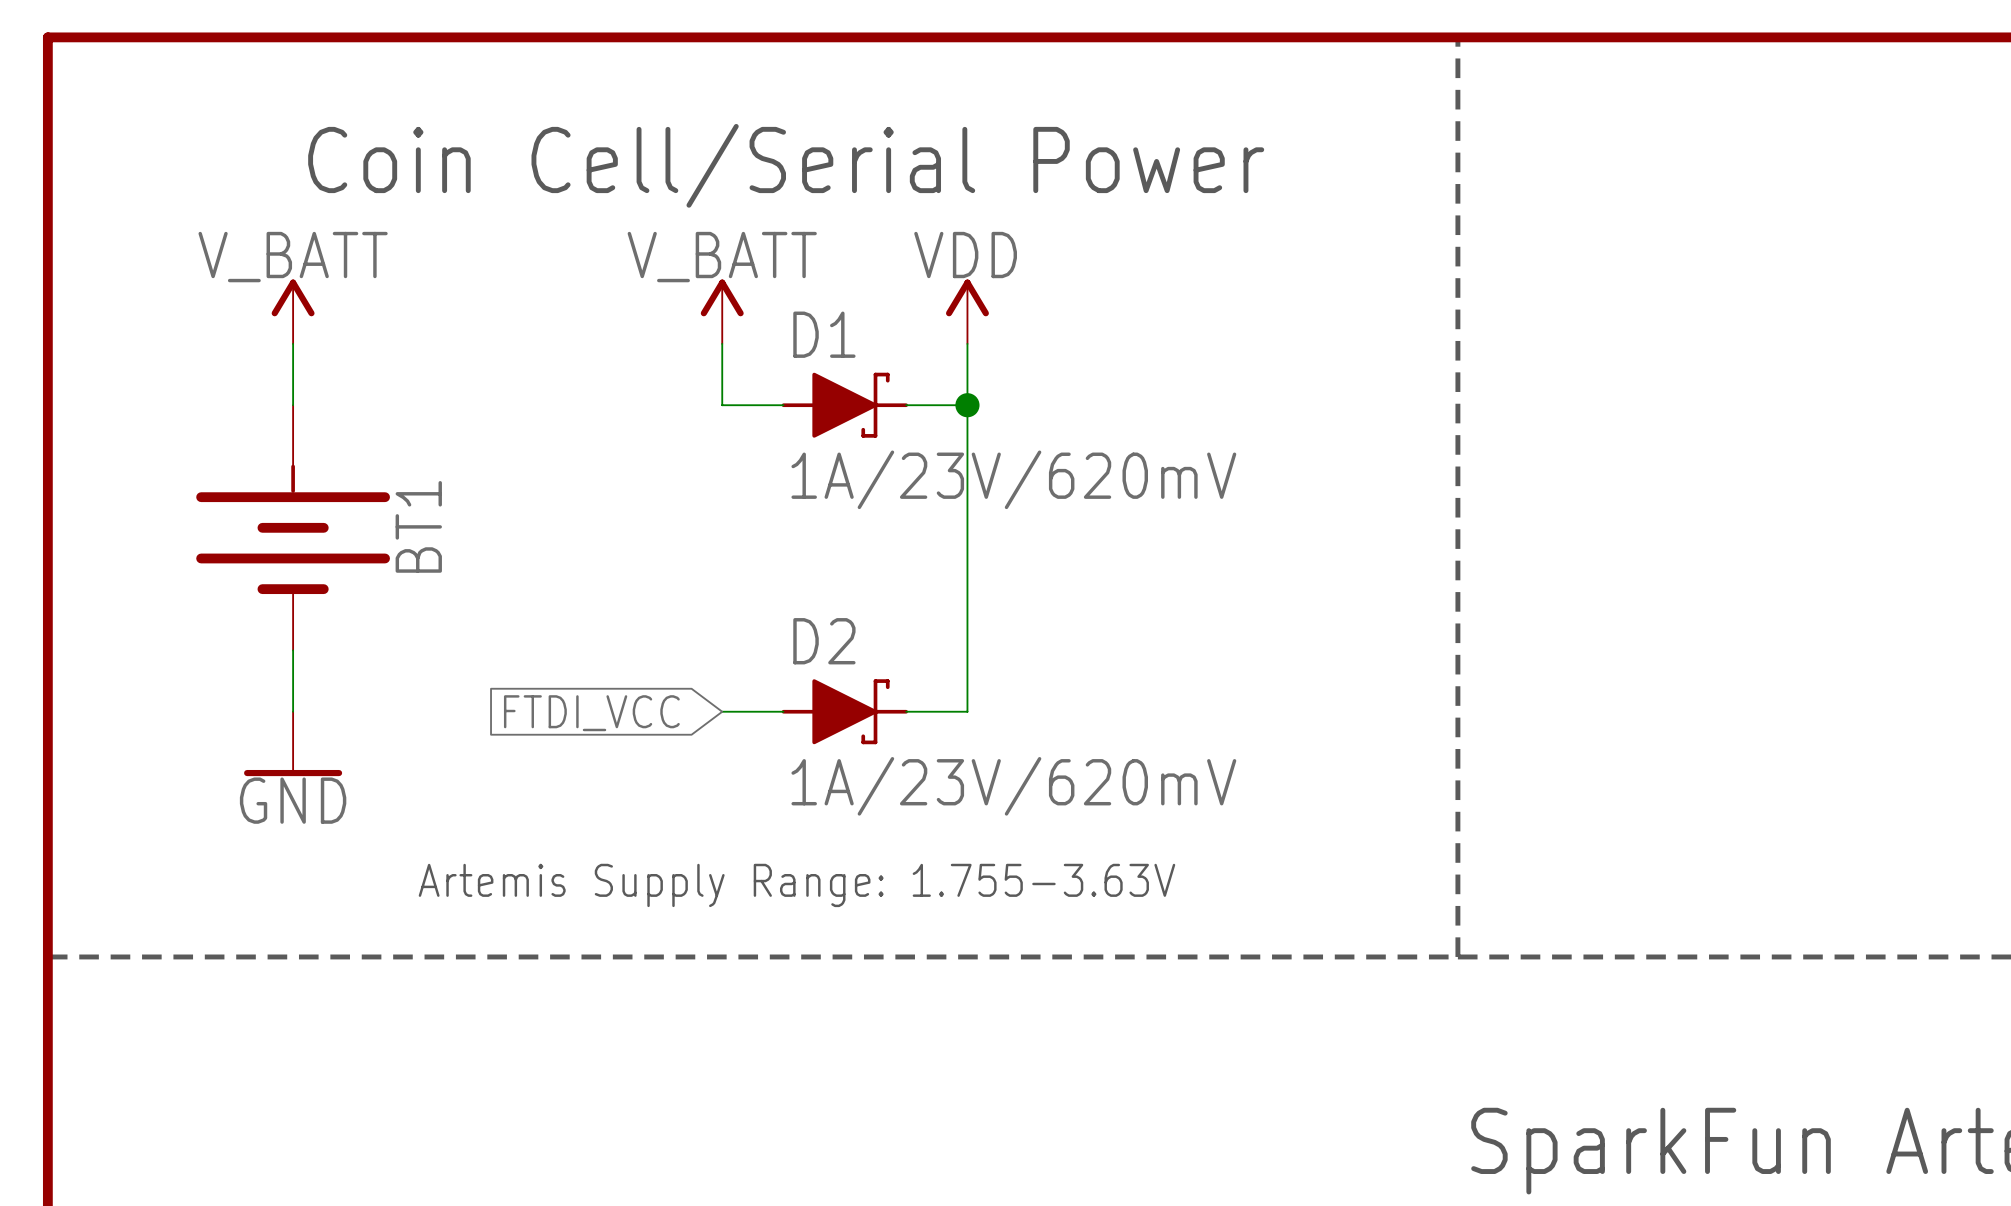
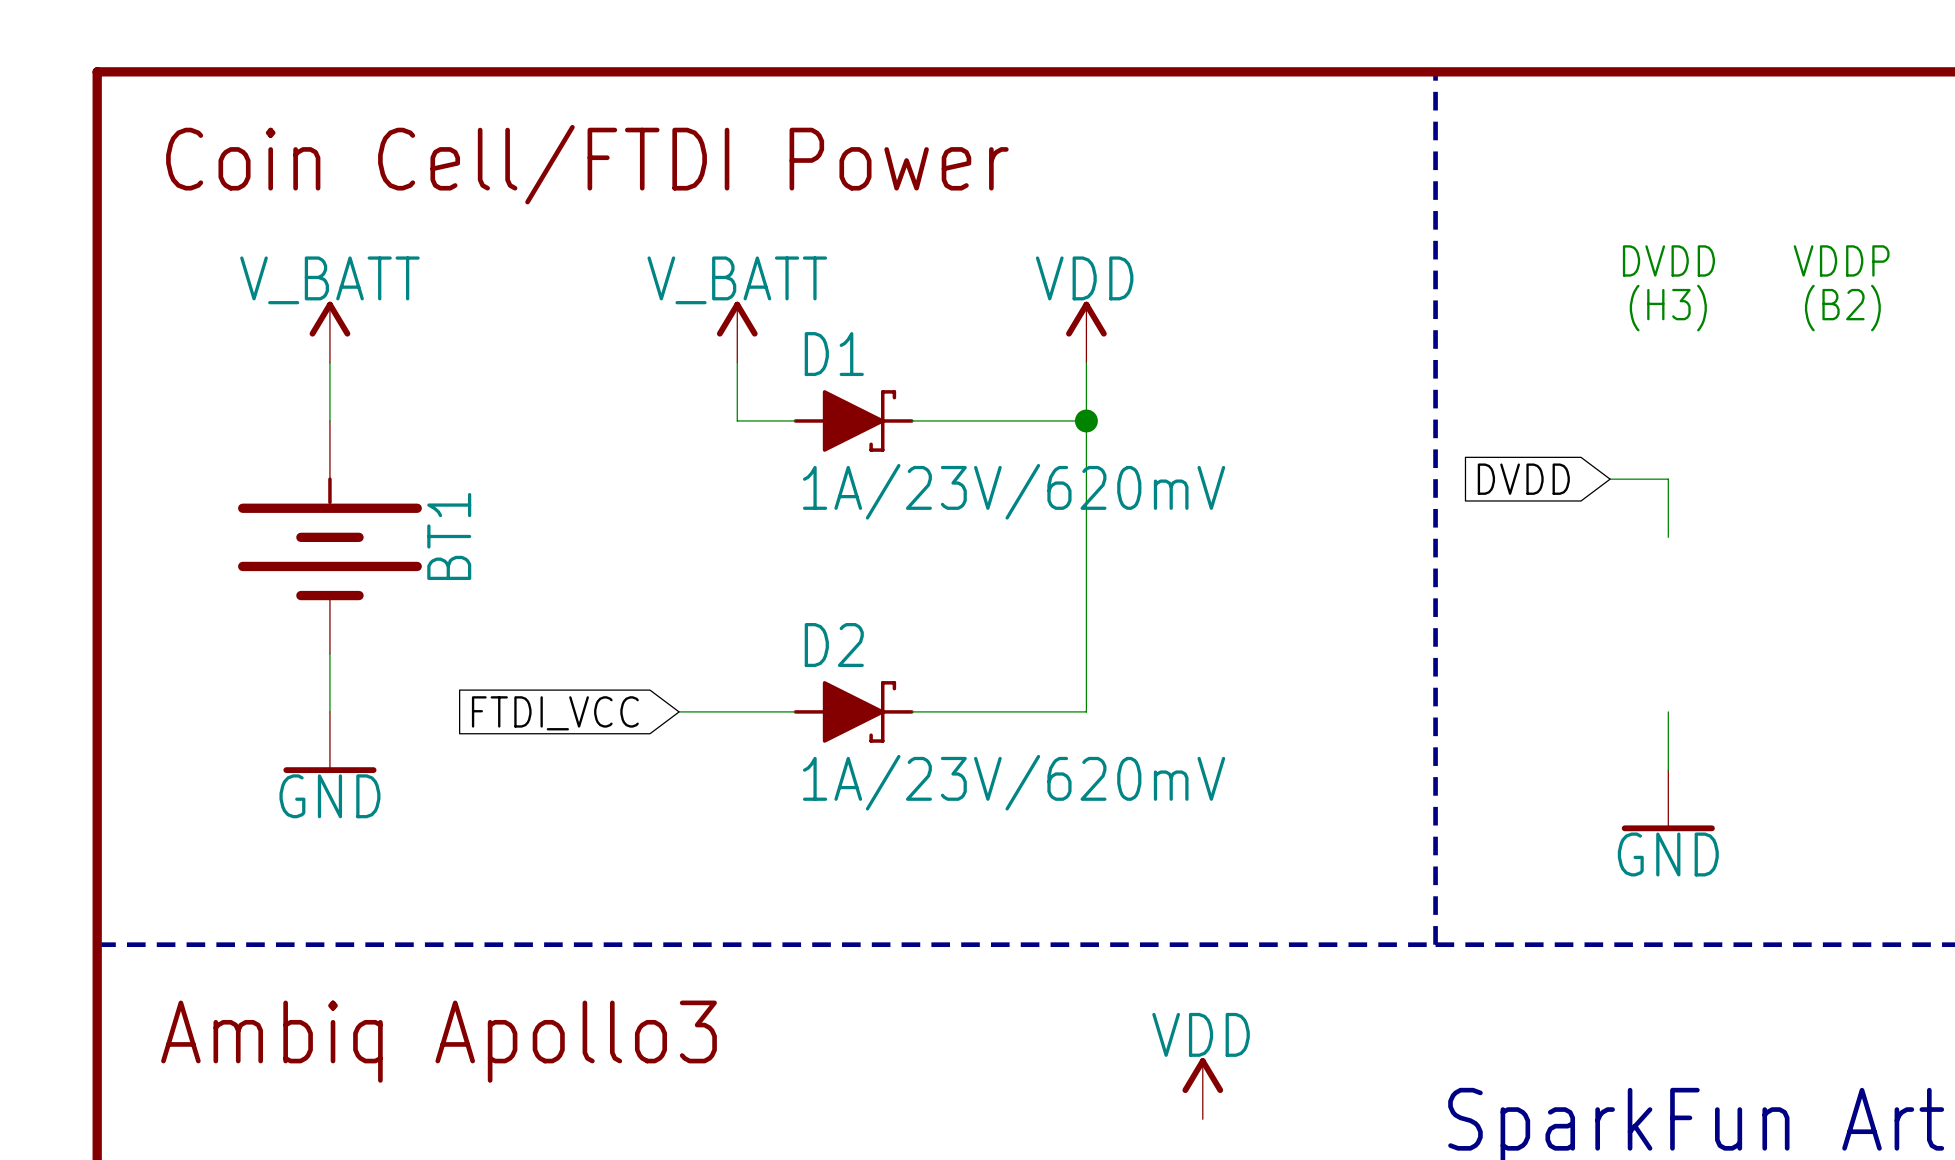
text: none -> Coin Cell/FTDI Power (587, 164)
text: Coin Cell/Serial Power (786, 165) -> none
text: none -> DVDD (1668, 260)
text: none -> VDDP (1841, 260)
text: none -> (H3) (1668, 308)
text: none -> (B2) (1842, 308)
power symbol position: VDD (967, 311) -> VDD (1086, 332)
wire: (967, 343) (967, 711) -> (1086, 362) (1086, 711) (970, 711)
wire: none -> (970, 420) (1086, 420)
junction position: (967, 405) -> (1086, 420)
global label: none -> DVDD (1523, 479)
wire: none -> (1610, 479) (1668, 479) (1668, 537)
wire: none -> (679, 711) (737, 711)
wire: none -> (1668, 711) (1668, 770)
global label position: FTDI_VCC (591, 713) -> FTDI_VCC (555, 713)
power symbol: none -> GND (1668, 800)
text: Artemis Supply Range: 1.755-3.63V (796, 885) -> none
text: none -> Ambiq Apollo3 (439, 1041)
power symbol: none -> VDD (1202, 1088)

